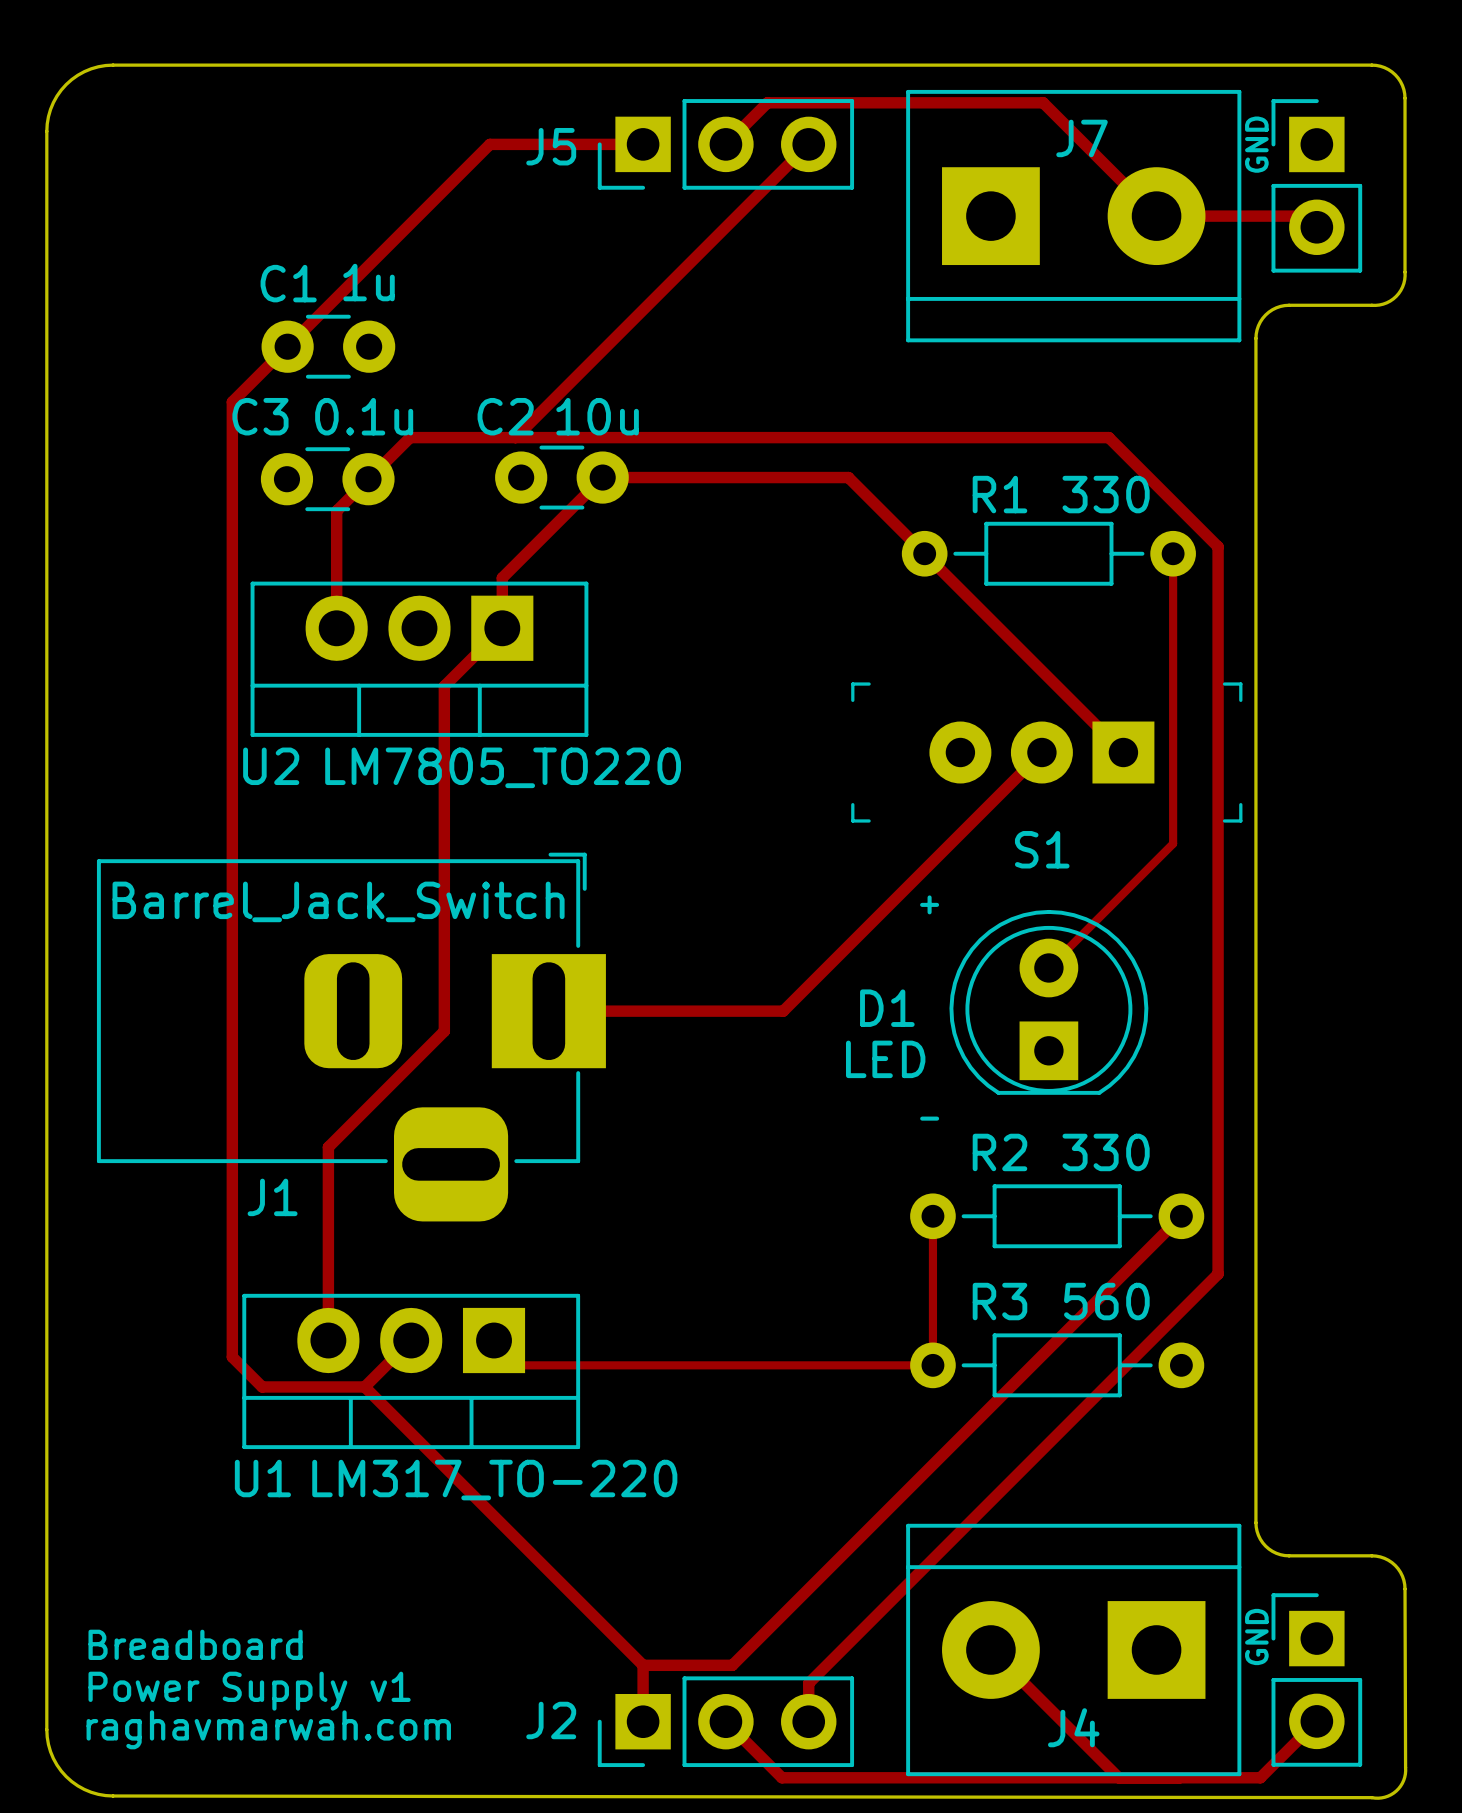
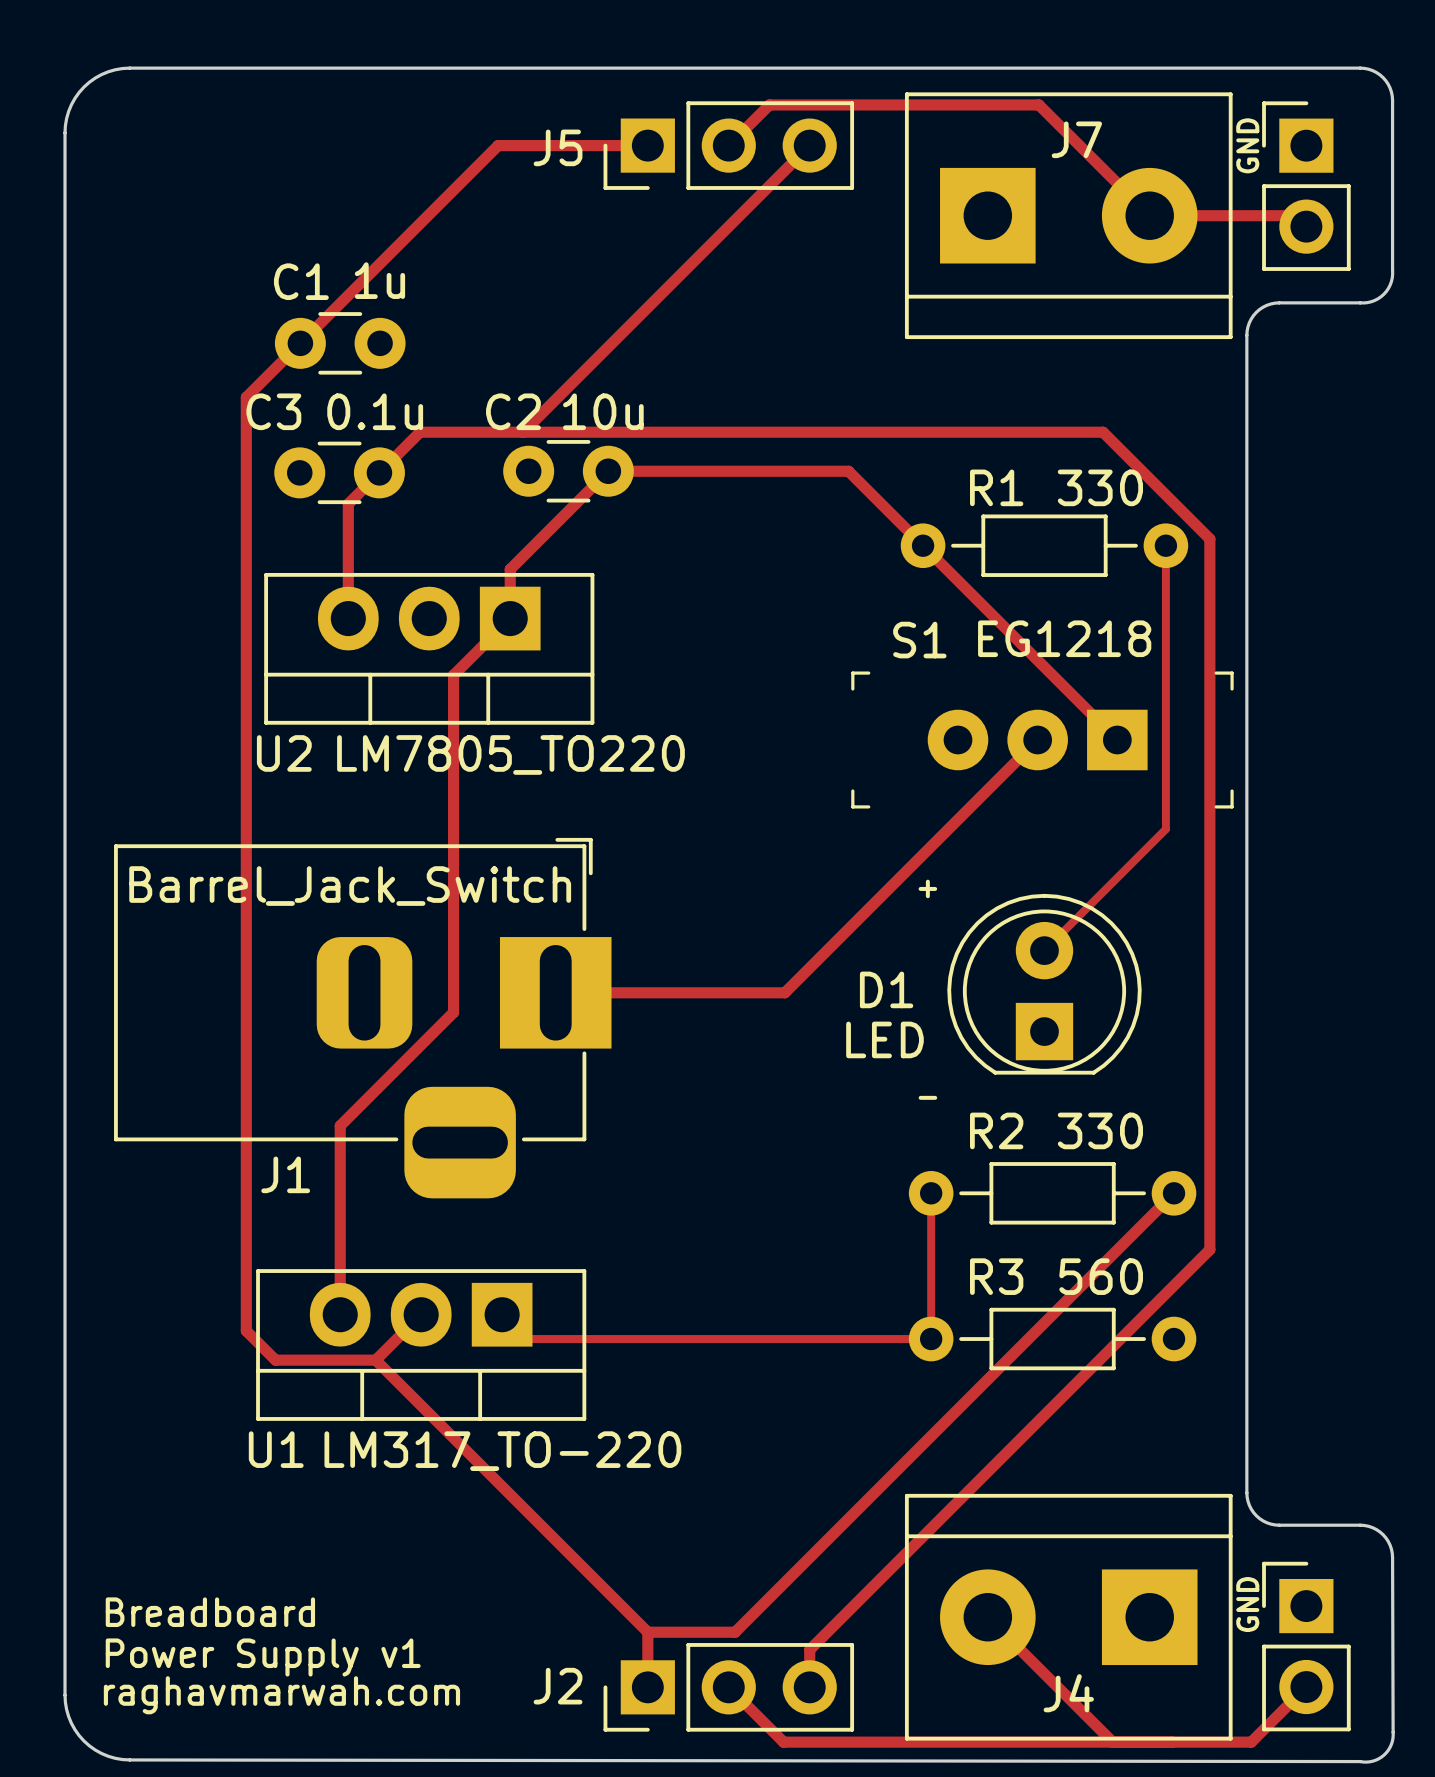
S1 value: none -> EG1218 (1064, 638)
S1 name position: S1 (1042, 849) -> S1 (919, 640)

